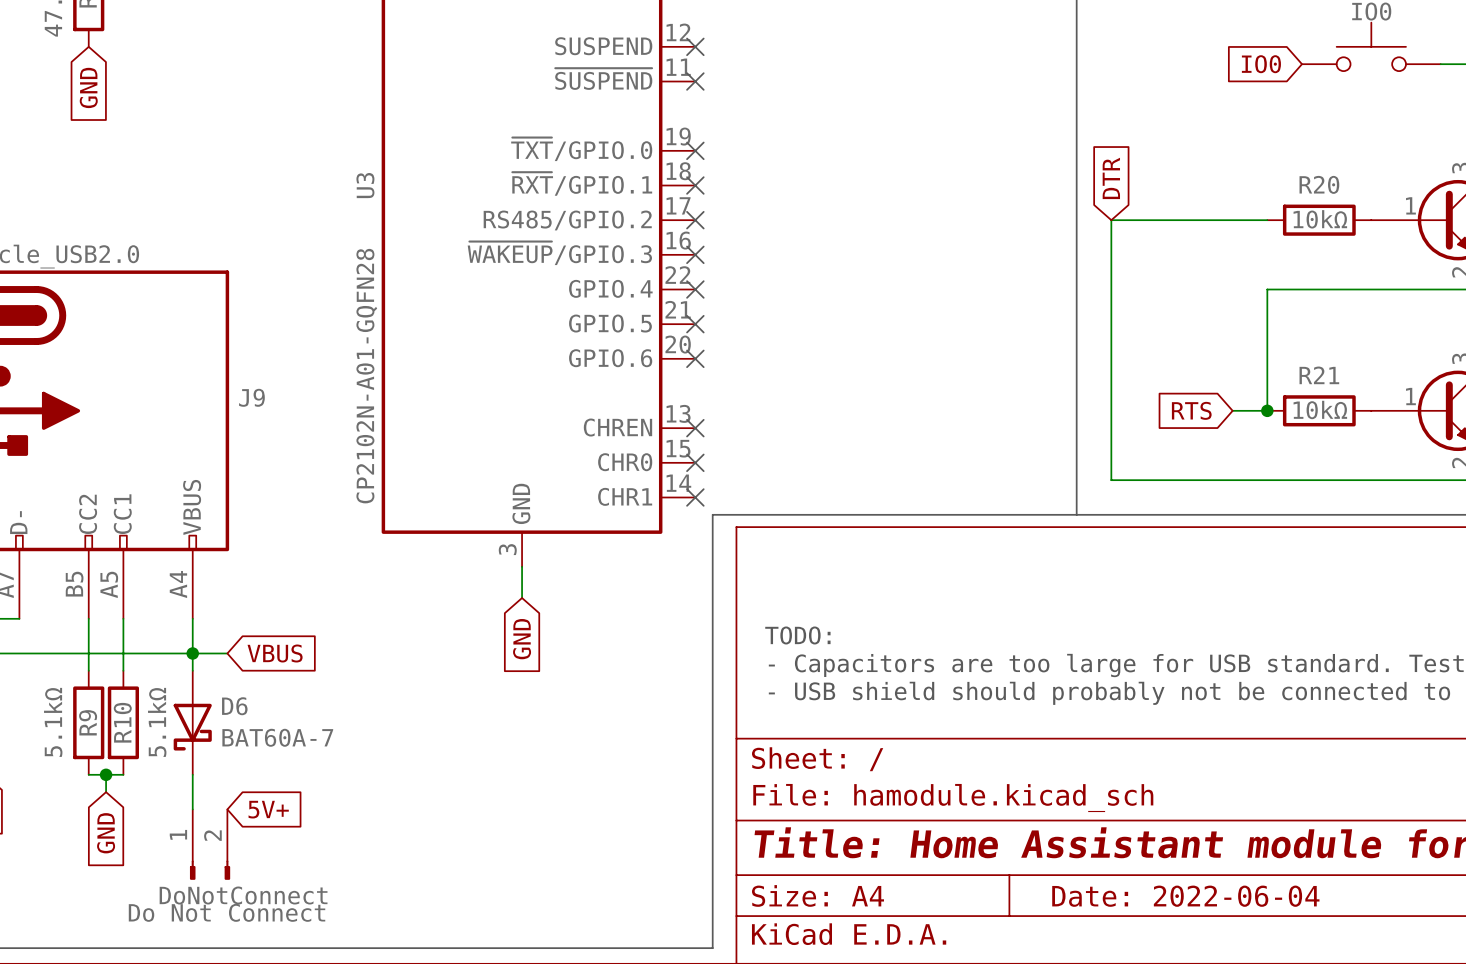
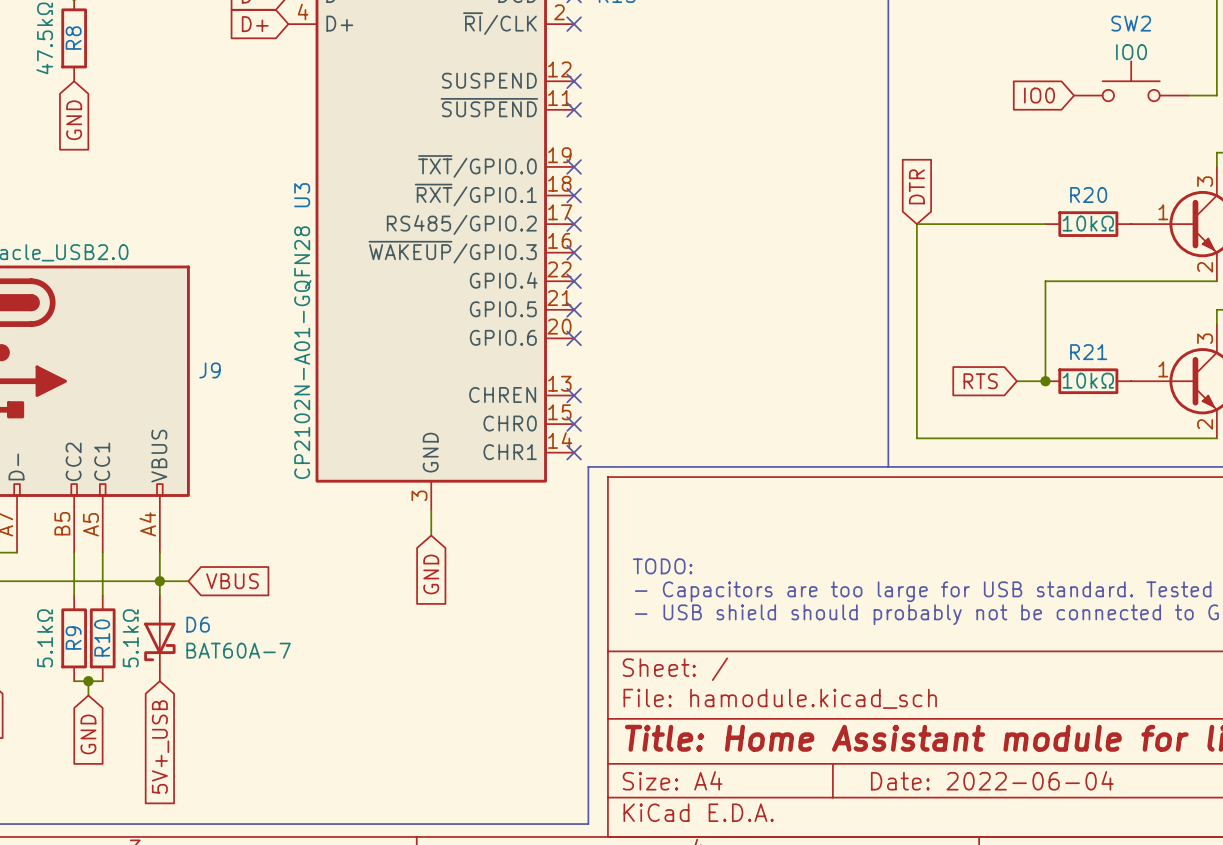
wire: (192, 774) (192, 809) -> none
global label: 5V+ (268, 809) -> none
global label: none -> 5V+_USB (160, 747)
part: DoNotConnect (210, 844) -> none

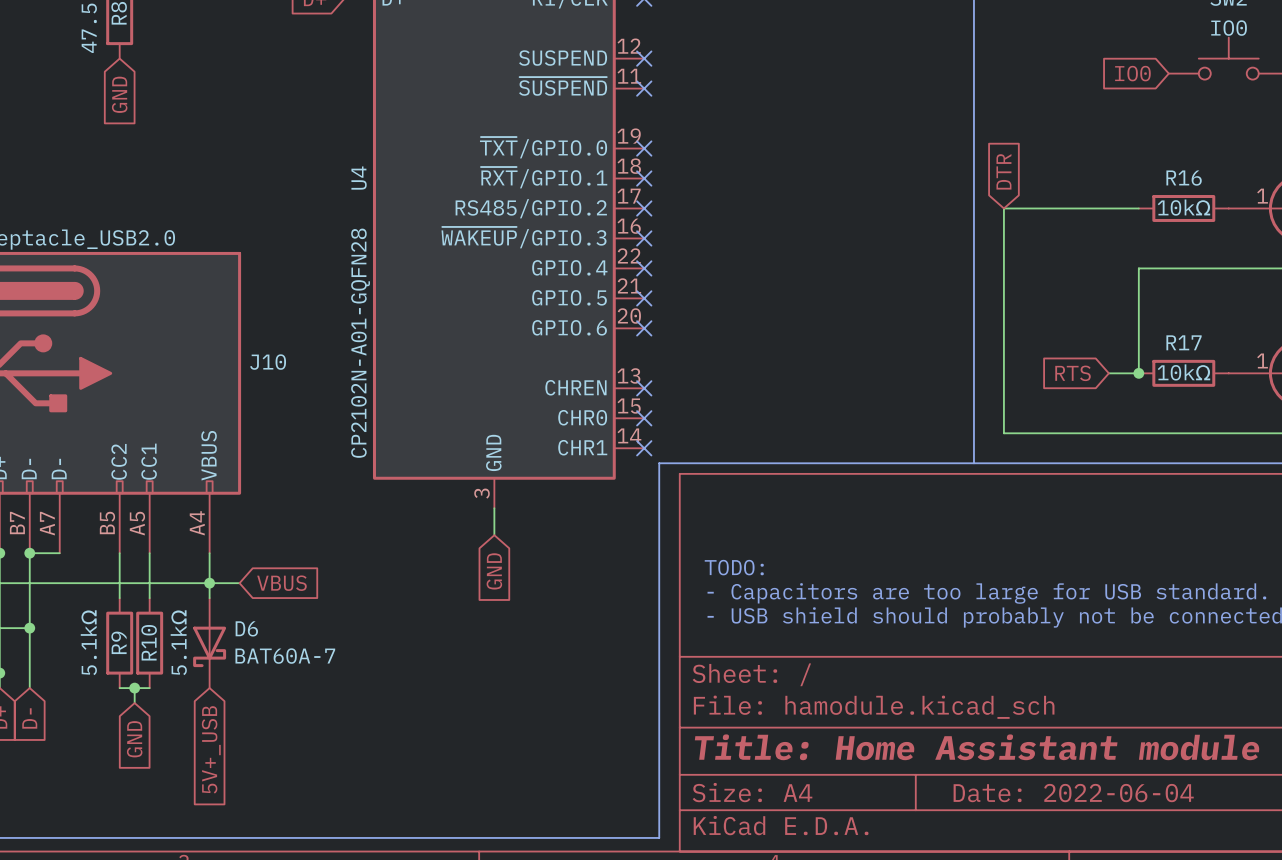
U3 name: U3 (302, 195) -> U4 (359, 178)
R20 name: R20 (1088, 195) -> R16 (1184, 178)
R21 name: R21 (1088, 352) -> R17 (1184, 342)
J9 name: J9 (210, 370) -> J10 (268, 362)

